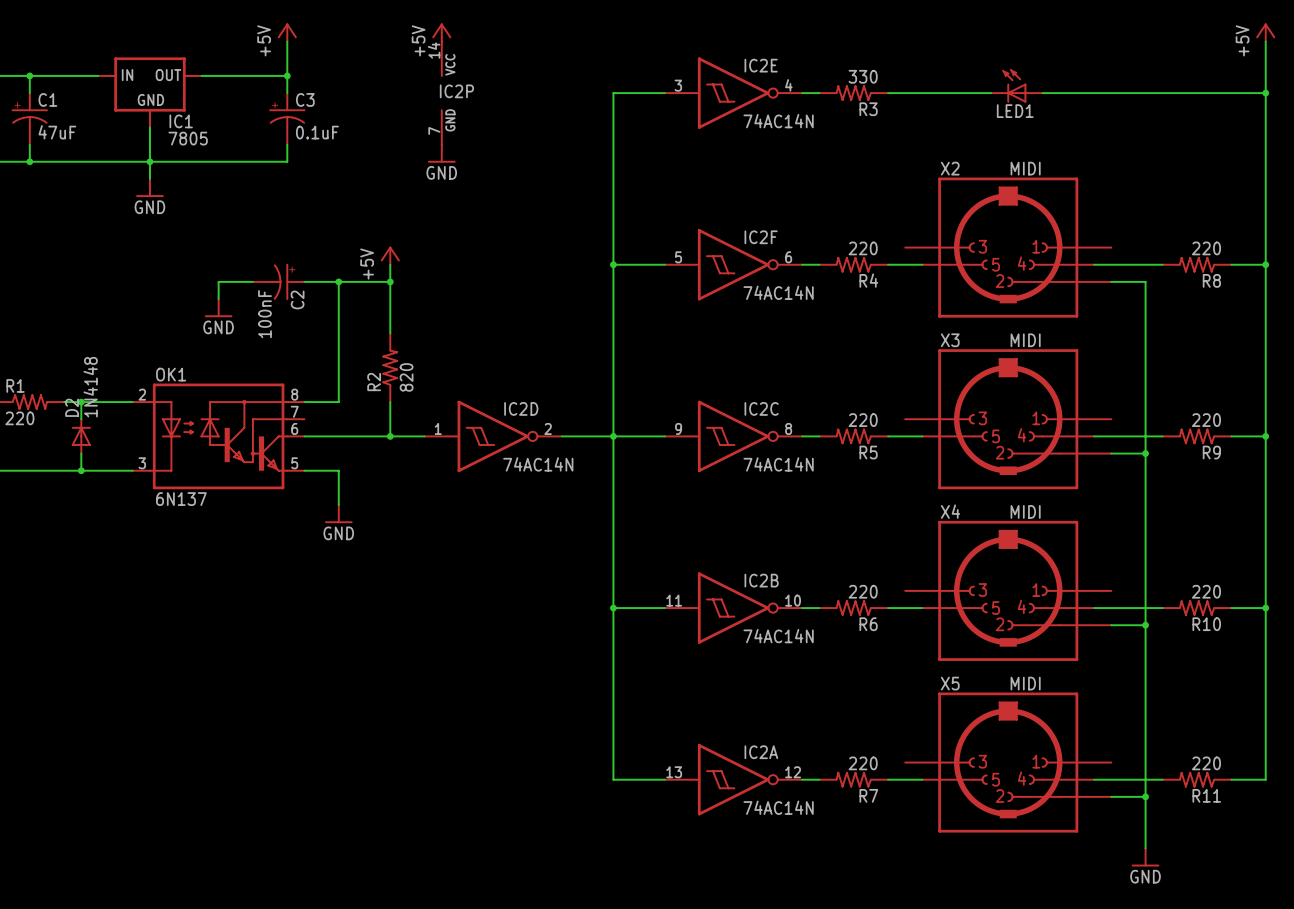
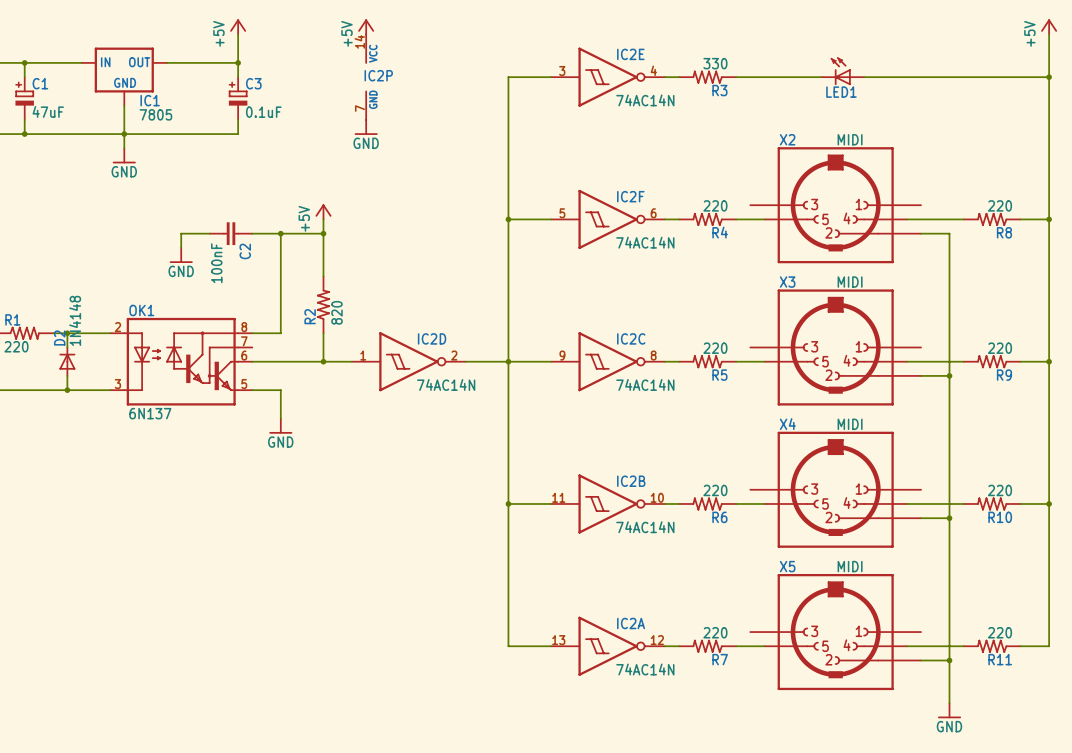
C1 symbol: [11, 93, 48, 145] -> [15, 77, 34, 120]
C3 symbol: [269, 93, 306, 145] -> [228, 77, 248, 120]
C2 symbol: [252, 263, 305, 300] -> [209, 222, 253, 246]

